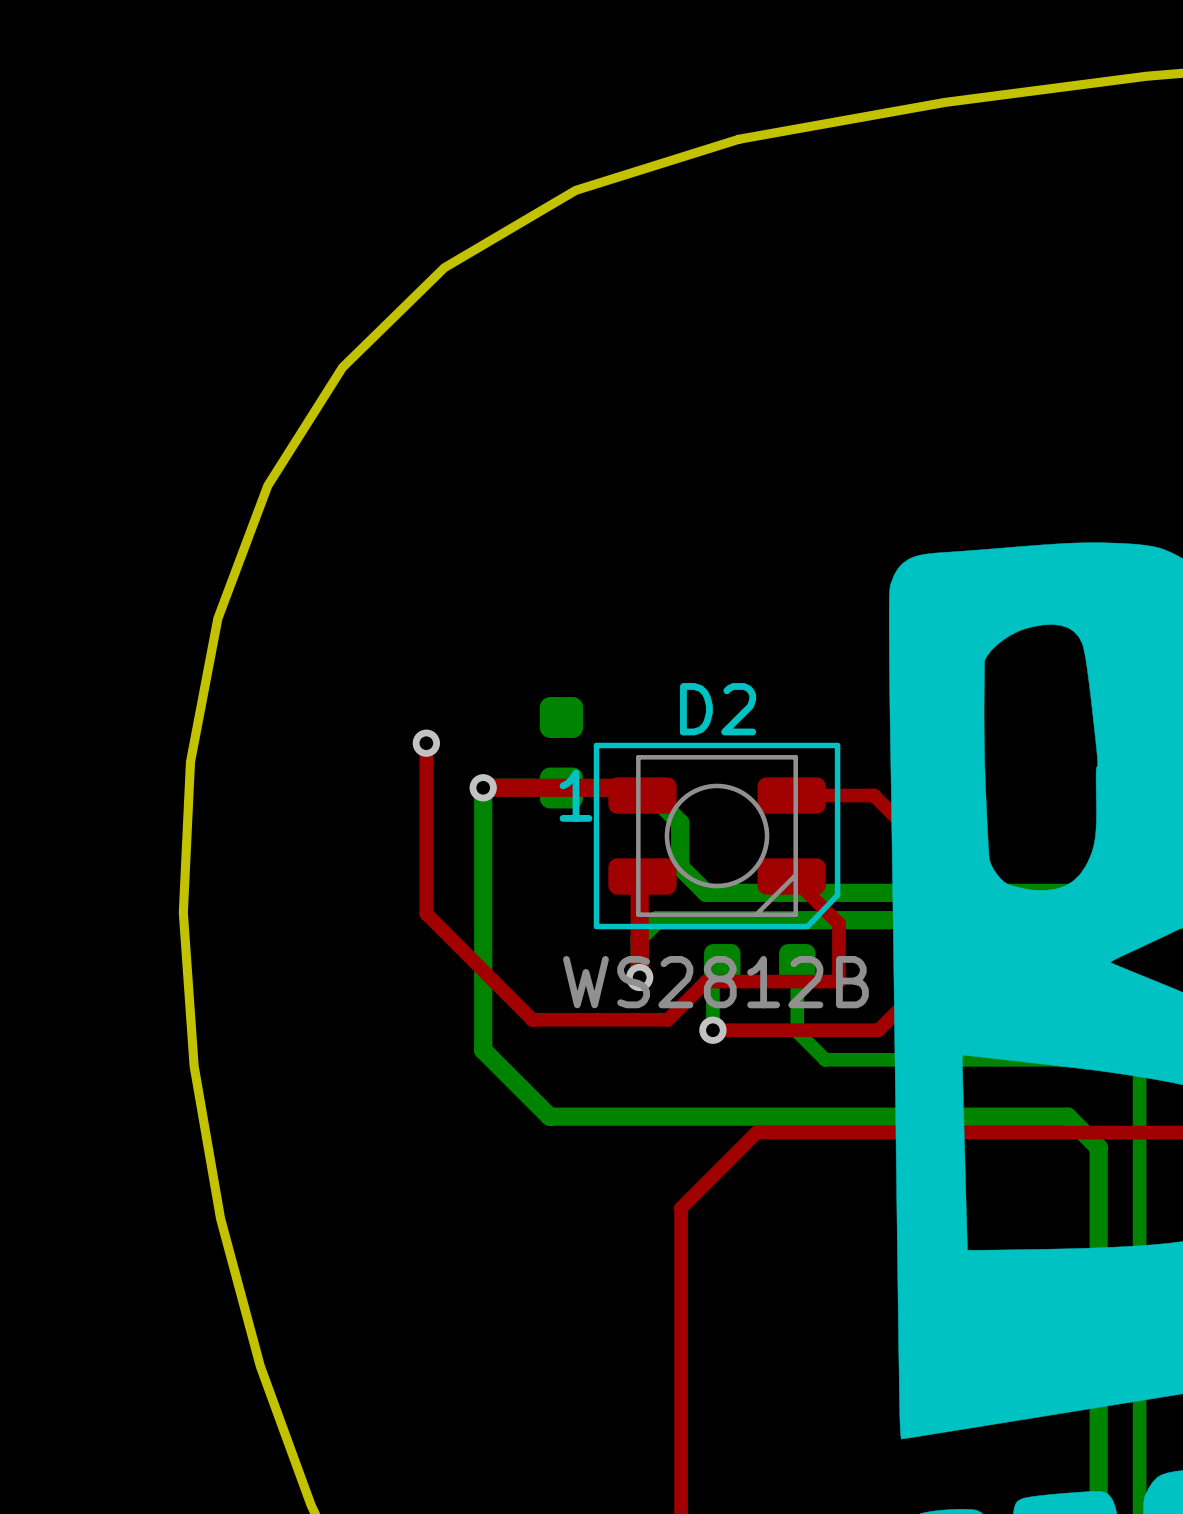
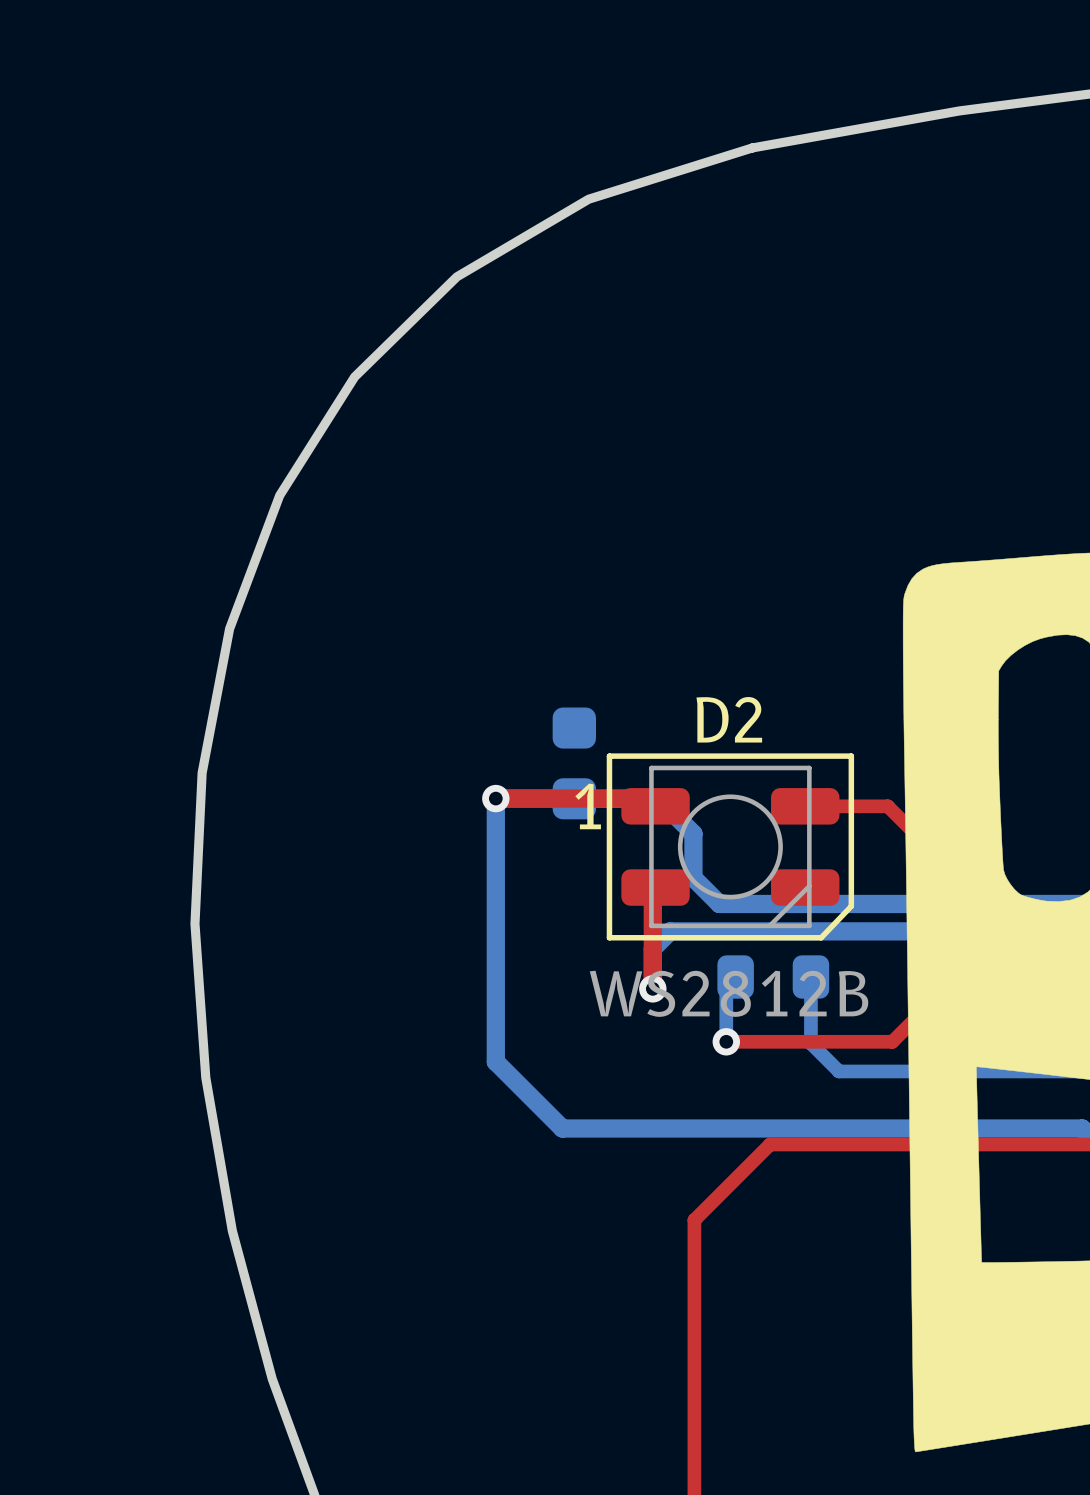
top track: (426, 743) (426, 913) (532, 1019) (667, 1019) (706, 981) (838, 981) (838, 923) (791, 876) -> none
via: (426, 743) -> none

